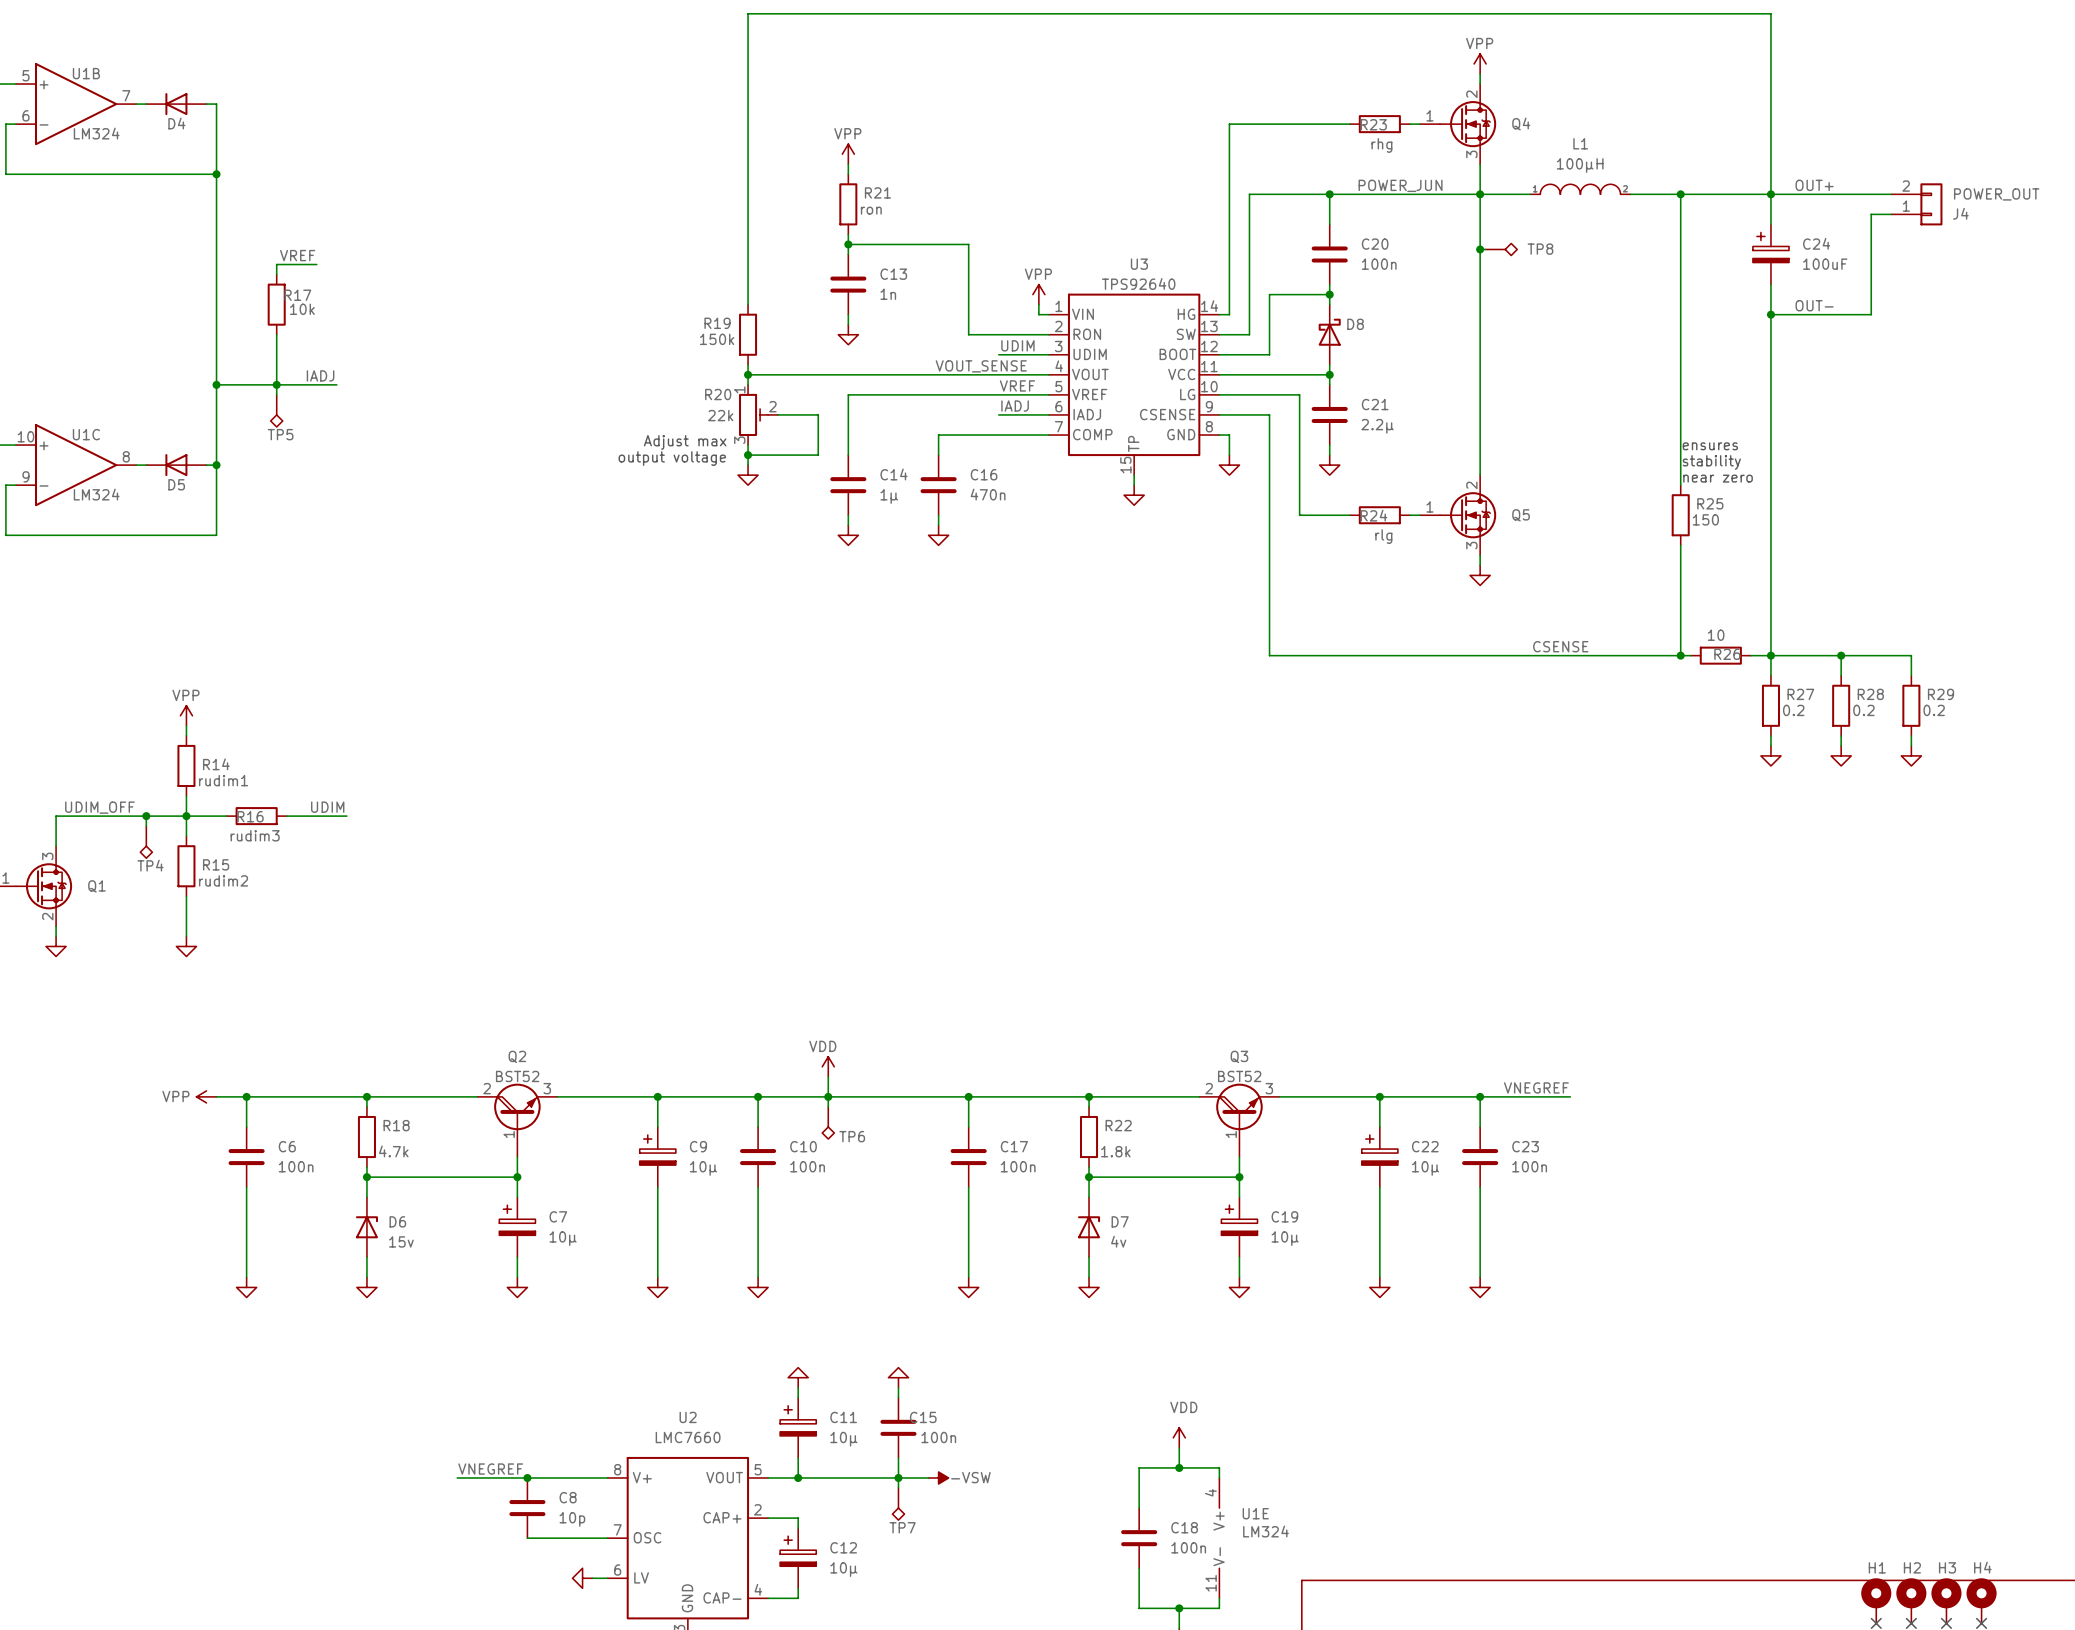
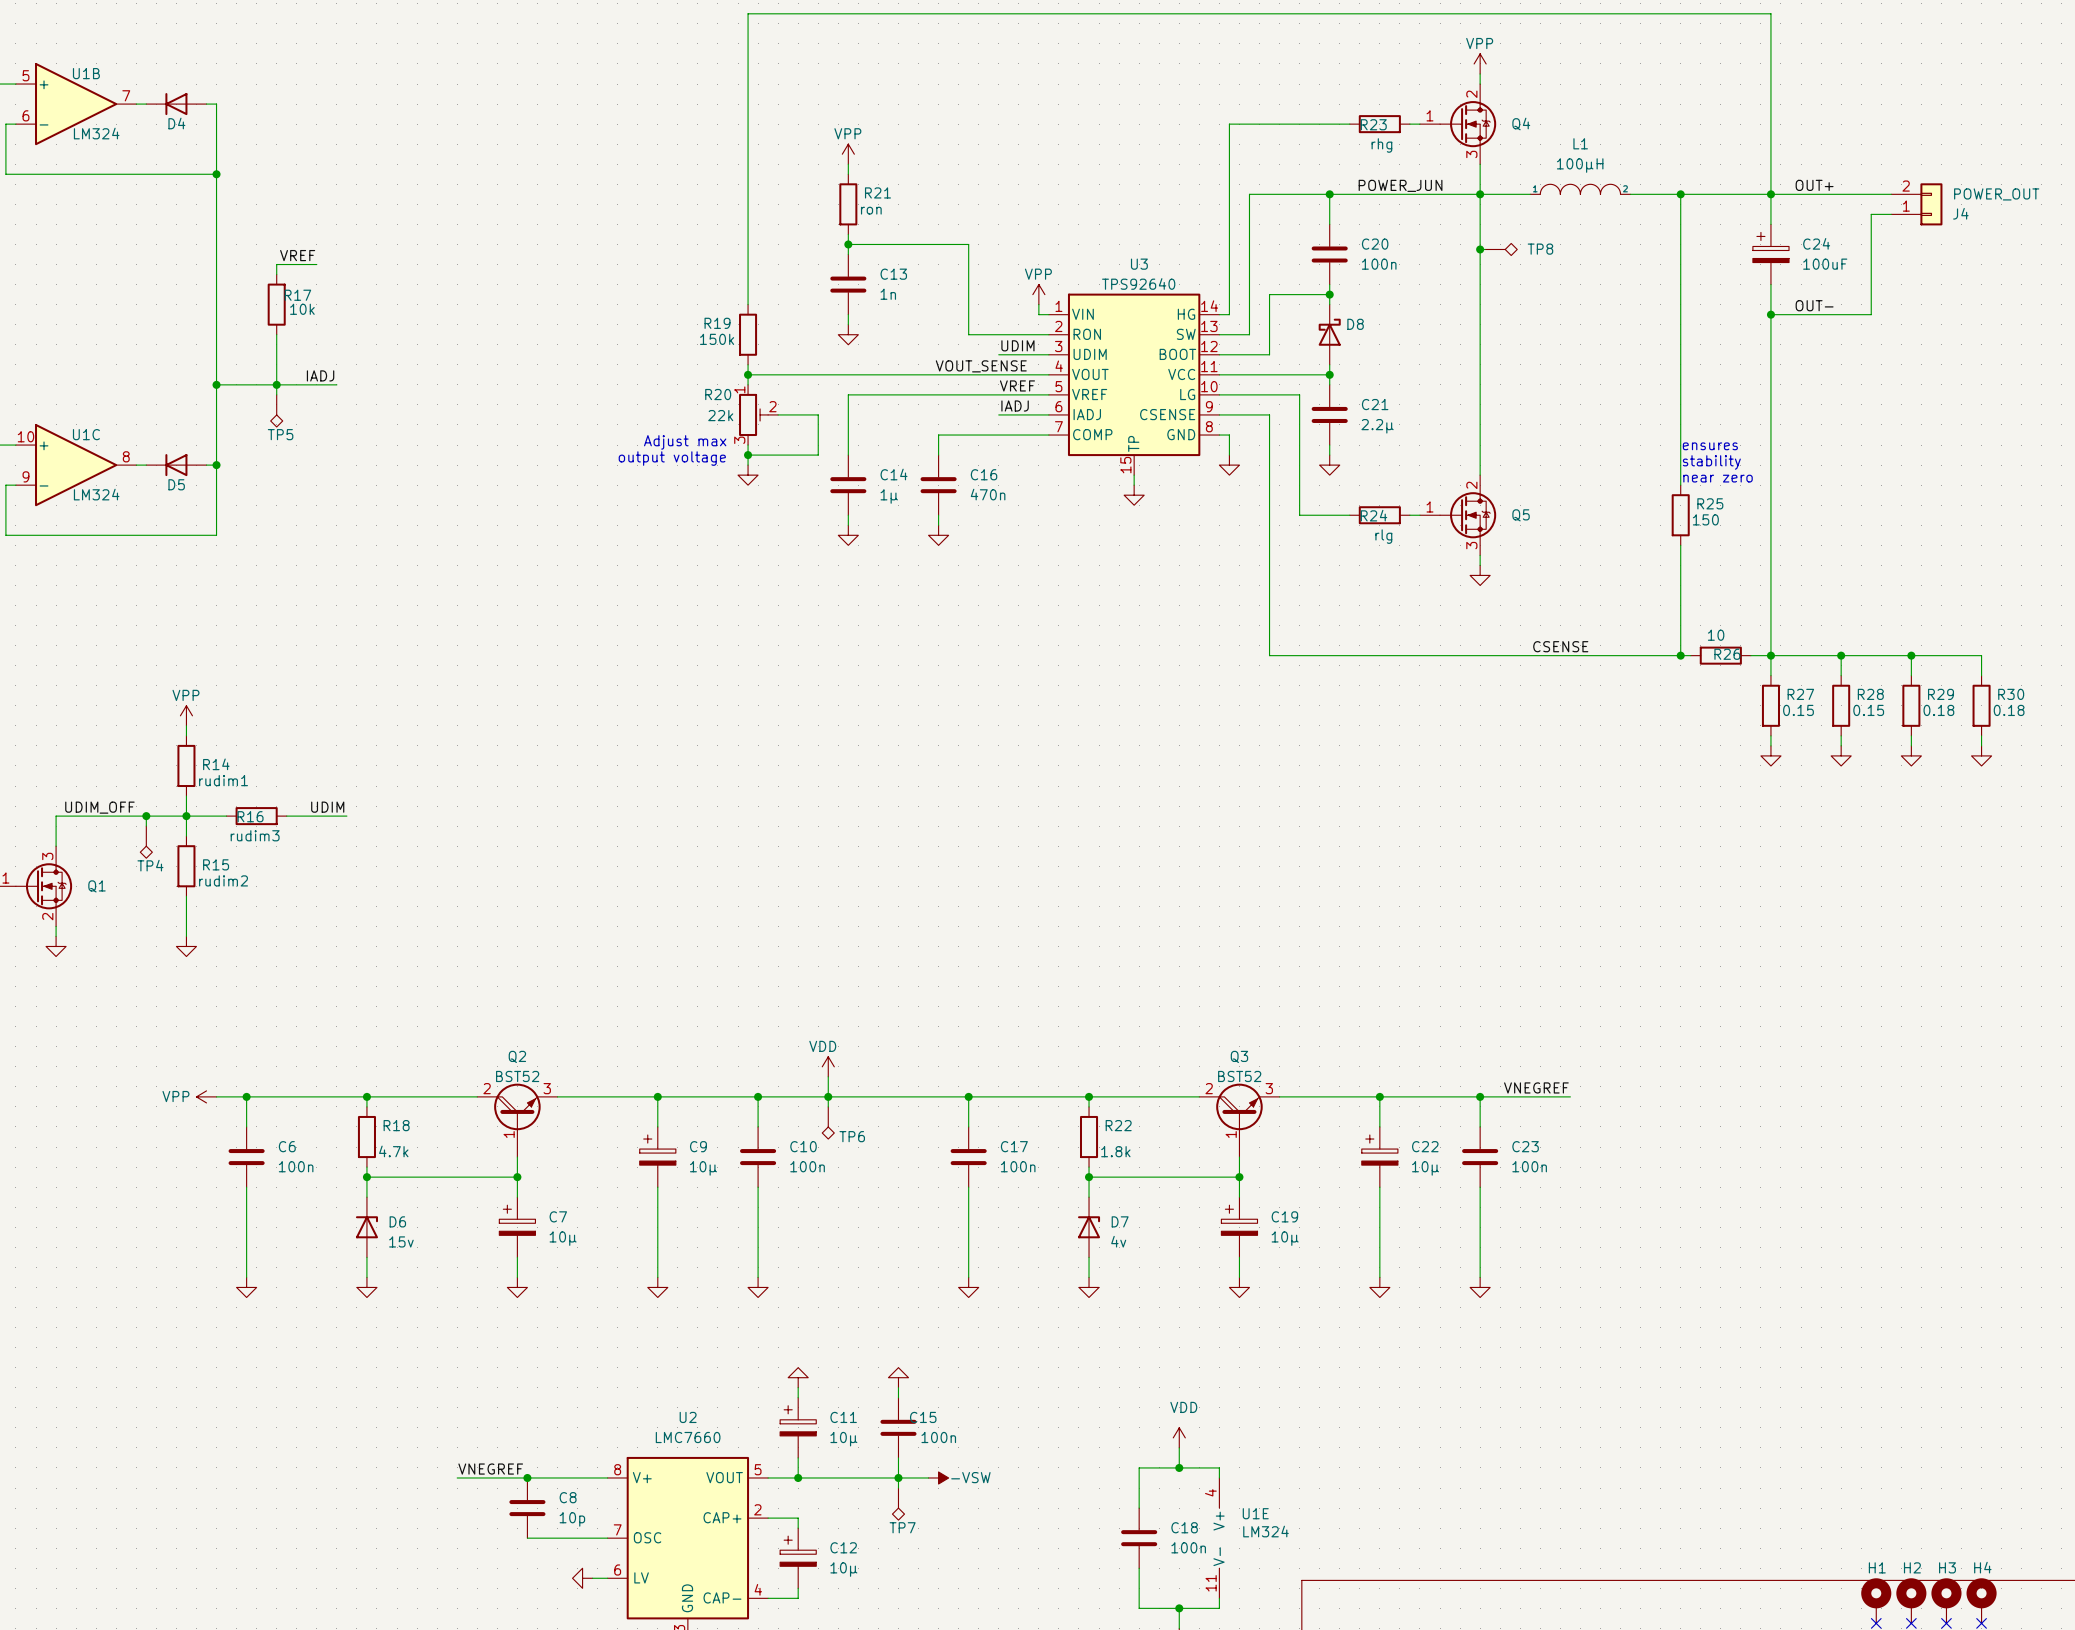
wire: none -> (1911, 655) (1981, 655) (1981, 675)
junction: none -> (1911, 655)
R30: none -> 0.18 (1981, 705)
R27 value: 0.2 (1793, 710) -> 0.15 (1798, 710)
R28 value: 0.2 (1863, 710) -> 0.15 (1868, 710)
R29 value: 0.2 (1934, 710) -> 0.18 (1938, 710)
wire: none -> (1981, 735) (1981, 745)
power symbol: none -> (1981, 755)

